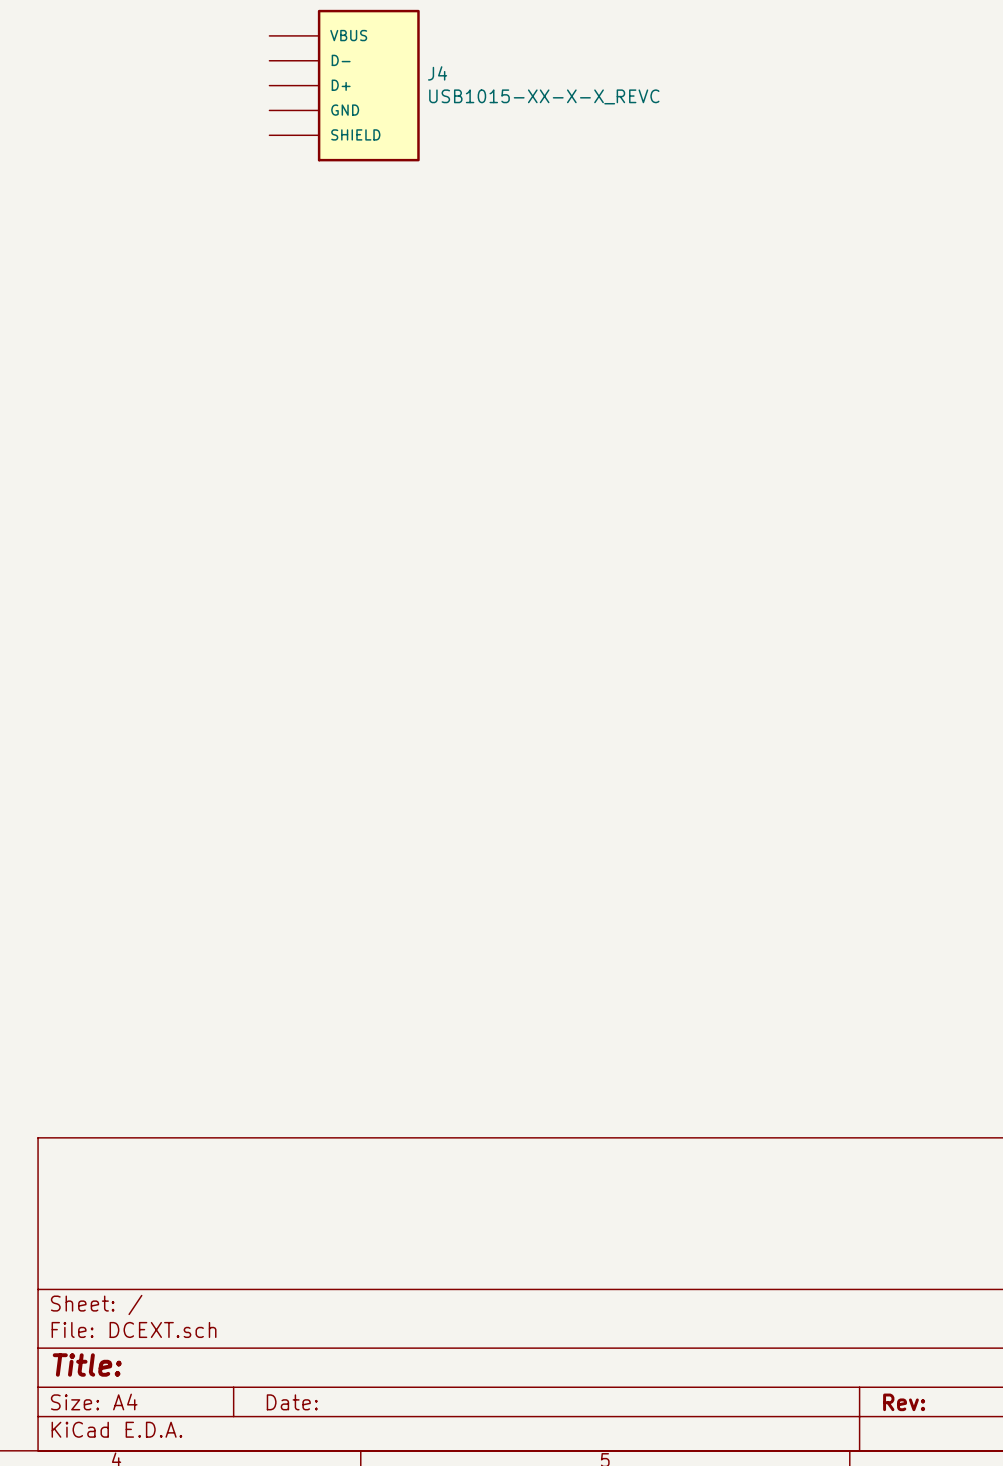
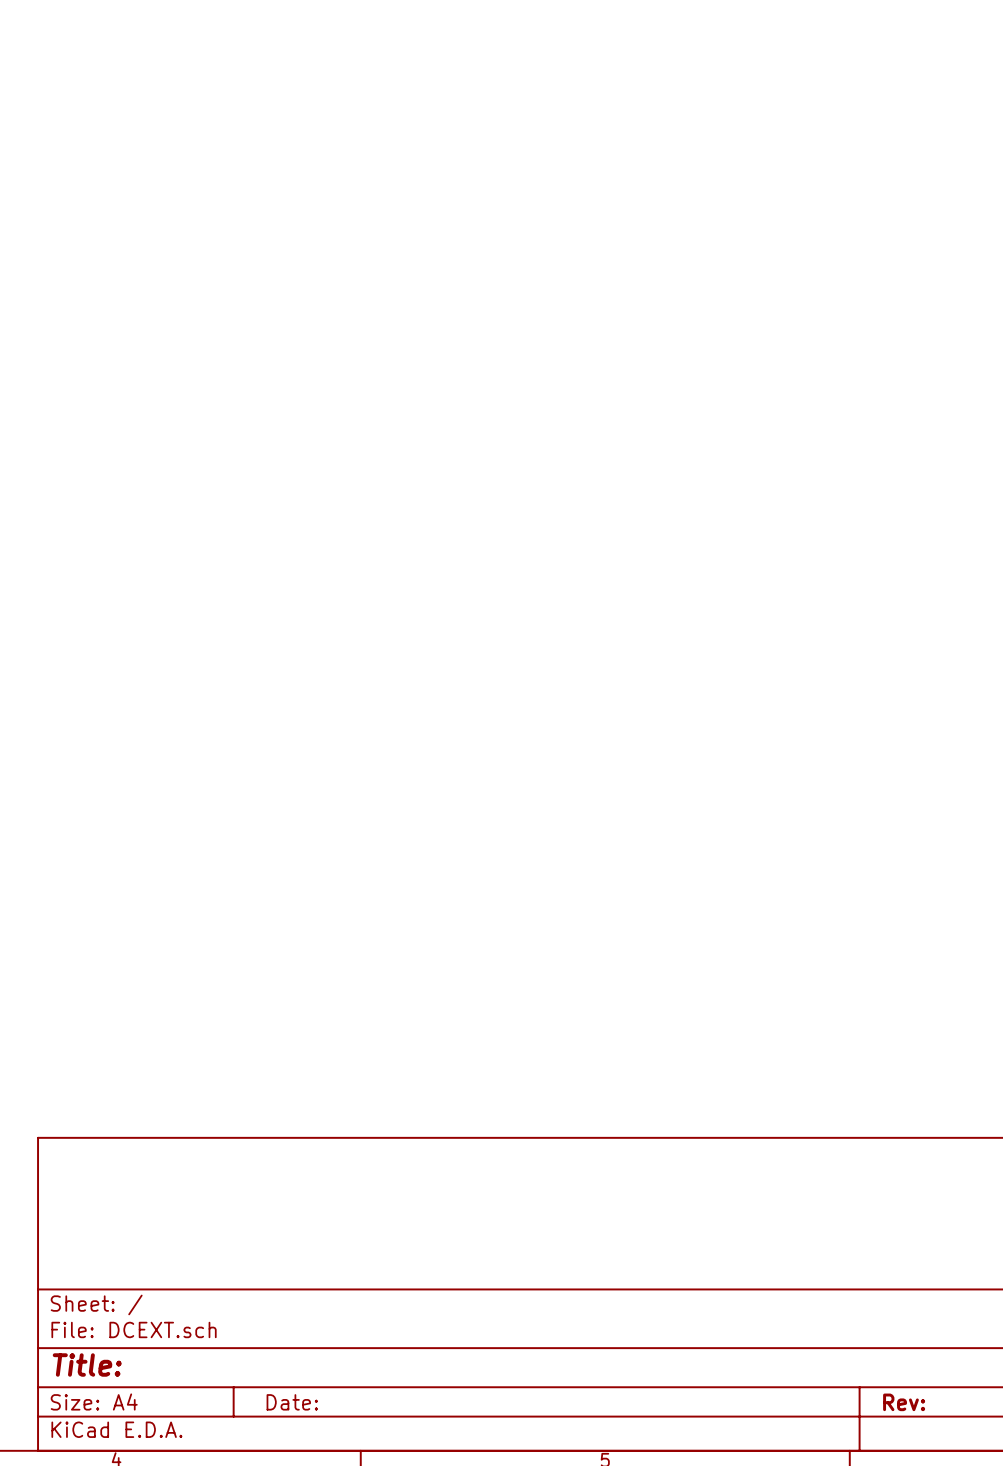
J4: USB1015-XX-X-X_REVC (344, 85) -> none

